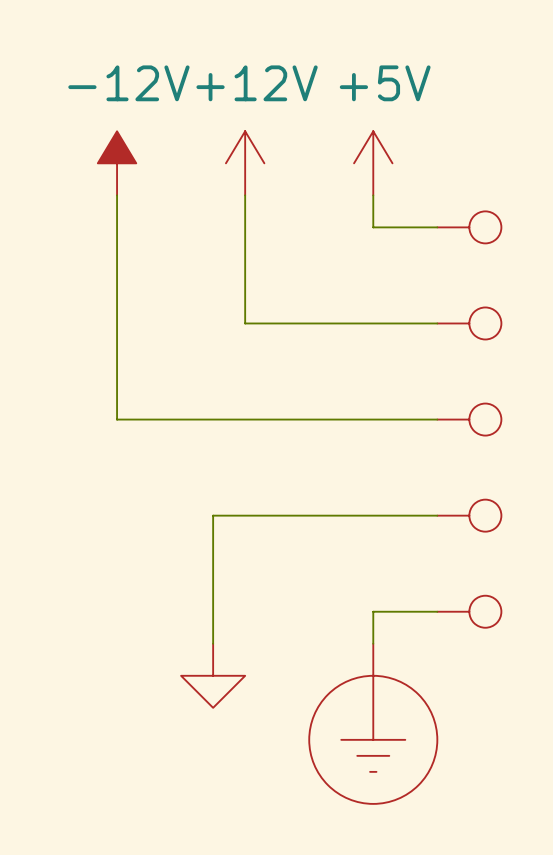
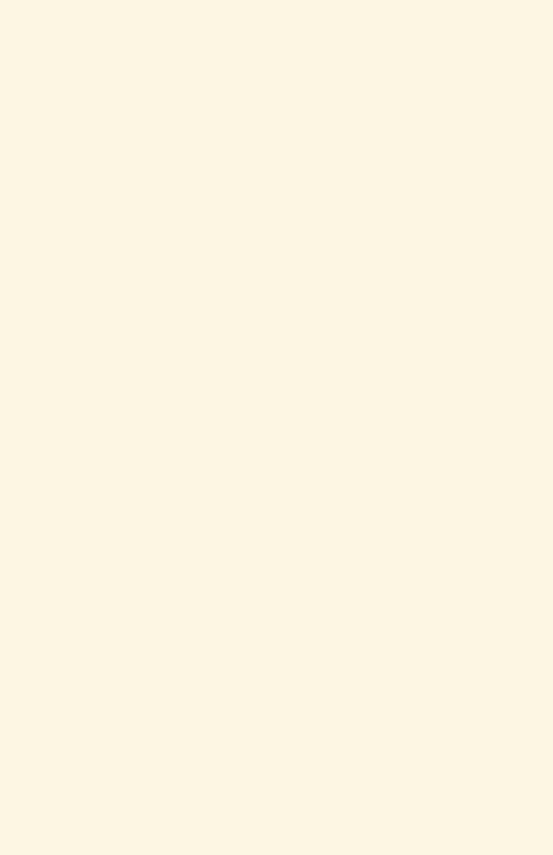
power symbol: -12V (117, 163) -> none
power symbol: +12V (245, 163) -> none
power symbol: +5V (373, 163) -> none
wire: (117, 195) (117, 419) (437, 419) -> none
wire: (245, 195) (245, 323) (437, 323) -> none
wire: (373, 195) (373, 227) (437, 227) -> none
power symbol: (469, 227) -> none
power symbol: (469, 323) -> none
power symbol: (469, 419) -> none
wire: (437, 515) (213, 515) (213, 643) -> none
power symbol: (469, 515) -> none
wire: (437, 611) (373, 611) (373, 643) -> none
power symbol: (469, 611) -> none
power symbol: (213, 675) -> none
power symbol: (373, 723) -> none

